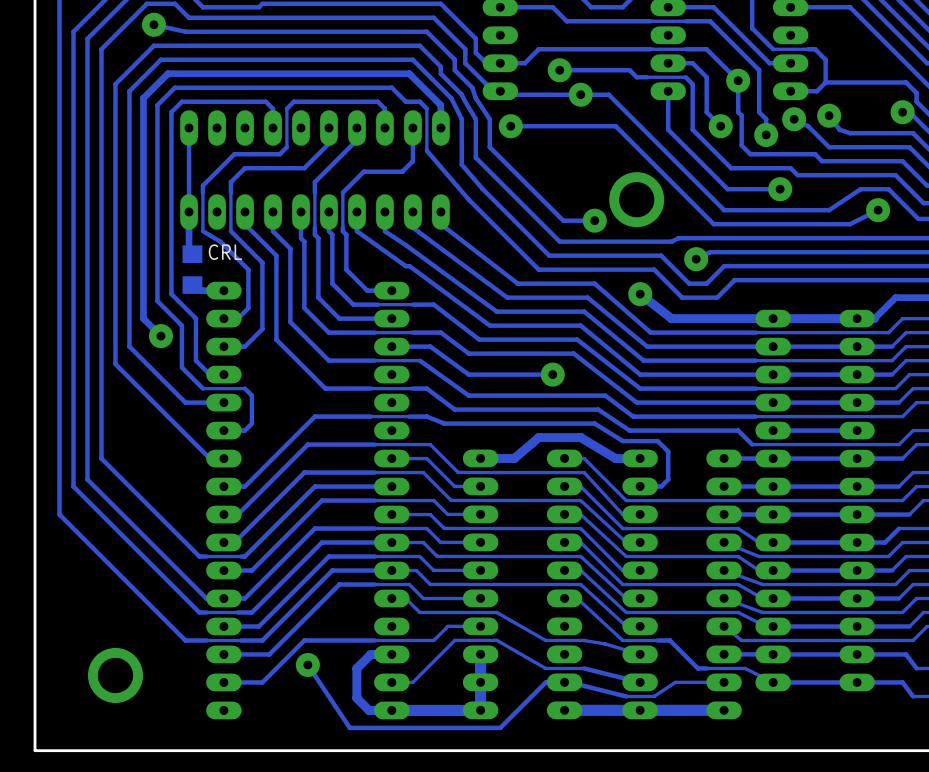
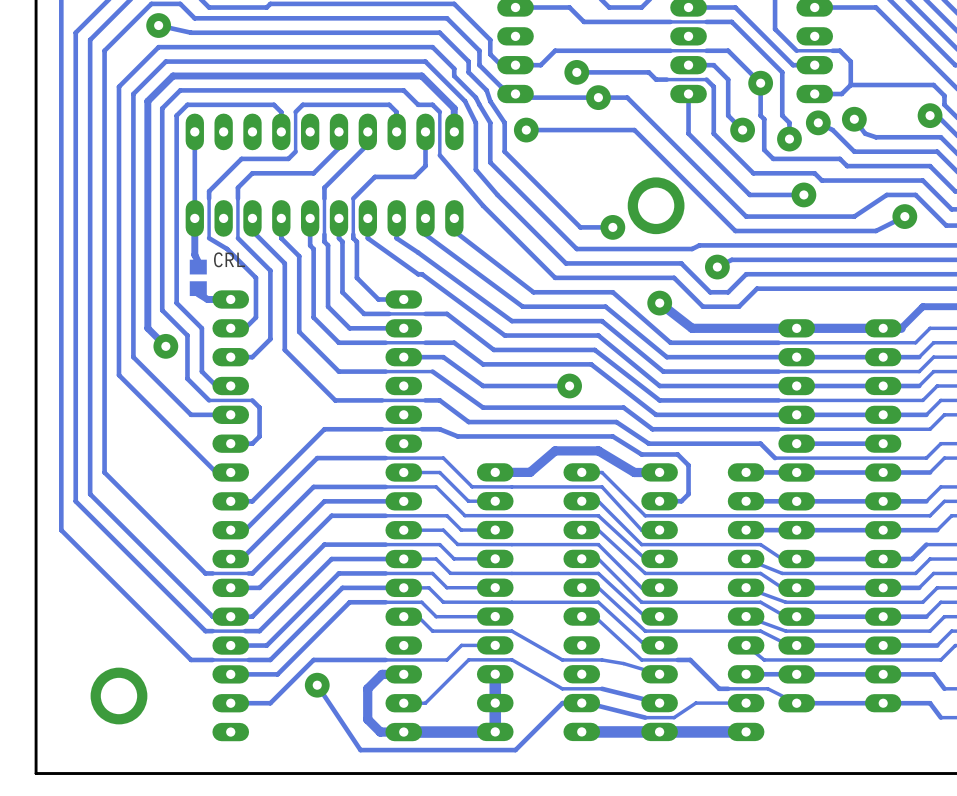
CRL footprint: [182, 245, 203, 294] -> [189, 259, 207, 297]

